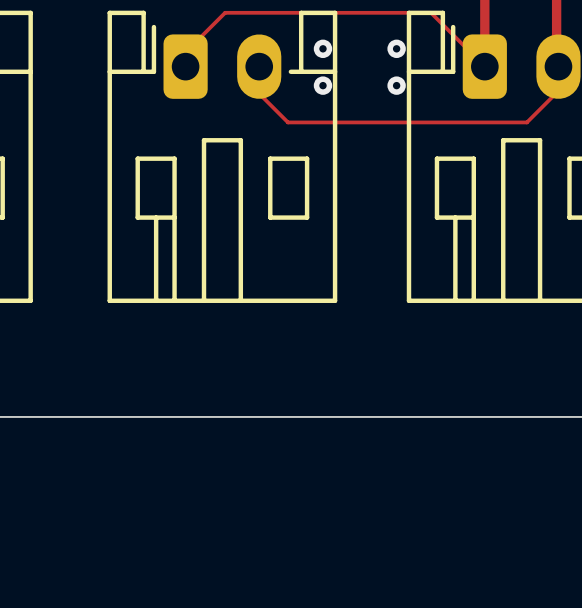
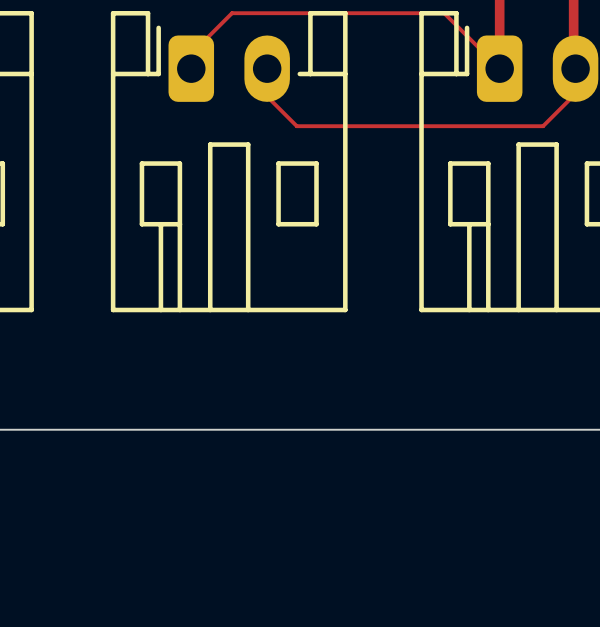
via: (322, 48) -> none
via: (396, 48) -> none
via: (322, 85) -> none
via: (396, 85) -> none

